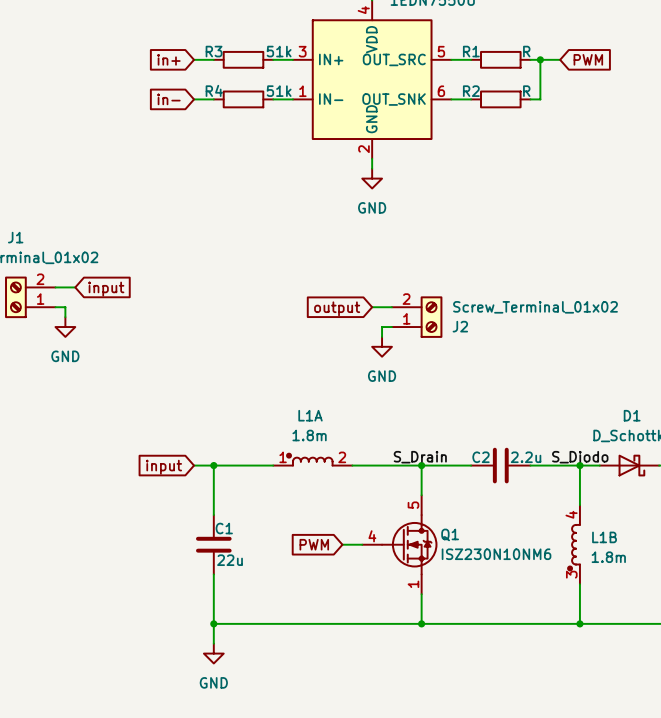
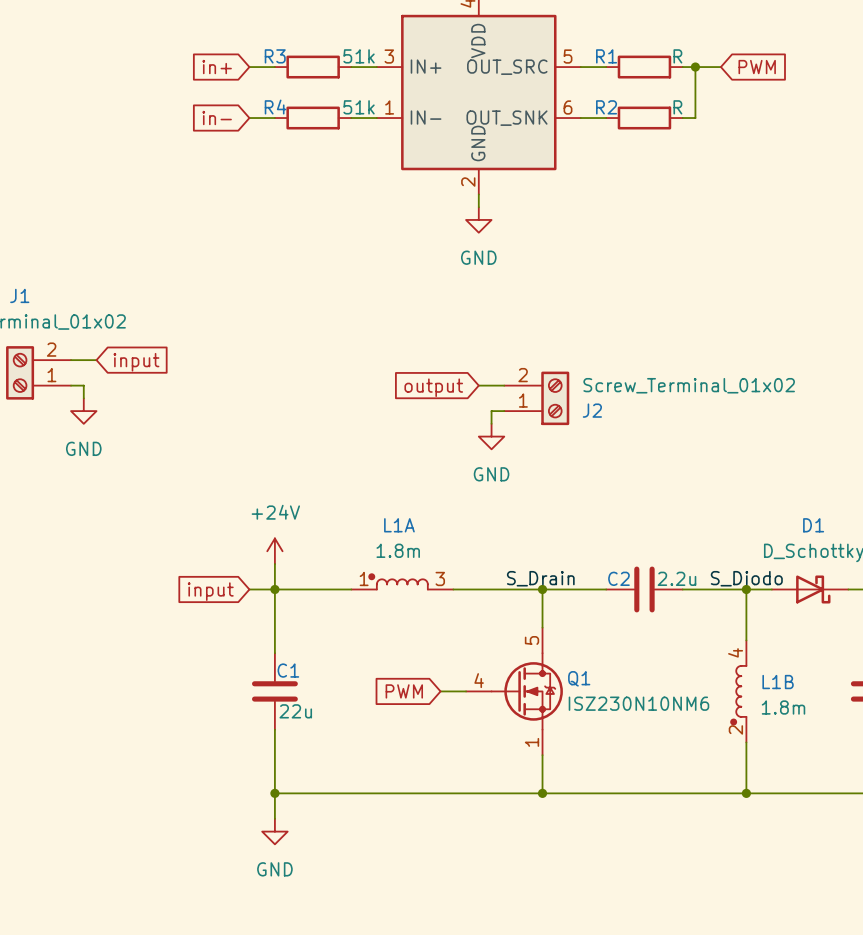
power symbol: none -> +24V (274, 551)
wire: none -> (274, 564) (274, 589)
L1A pin number: 2 (342, 457) -> 3 (440, 578)
L1B pin number: 3 (571, 574) -> 2 (735, 729)

